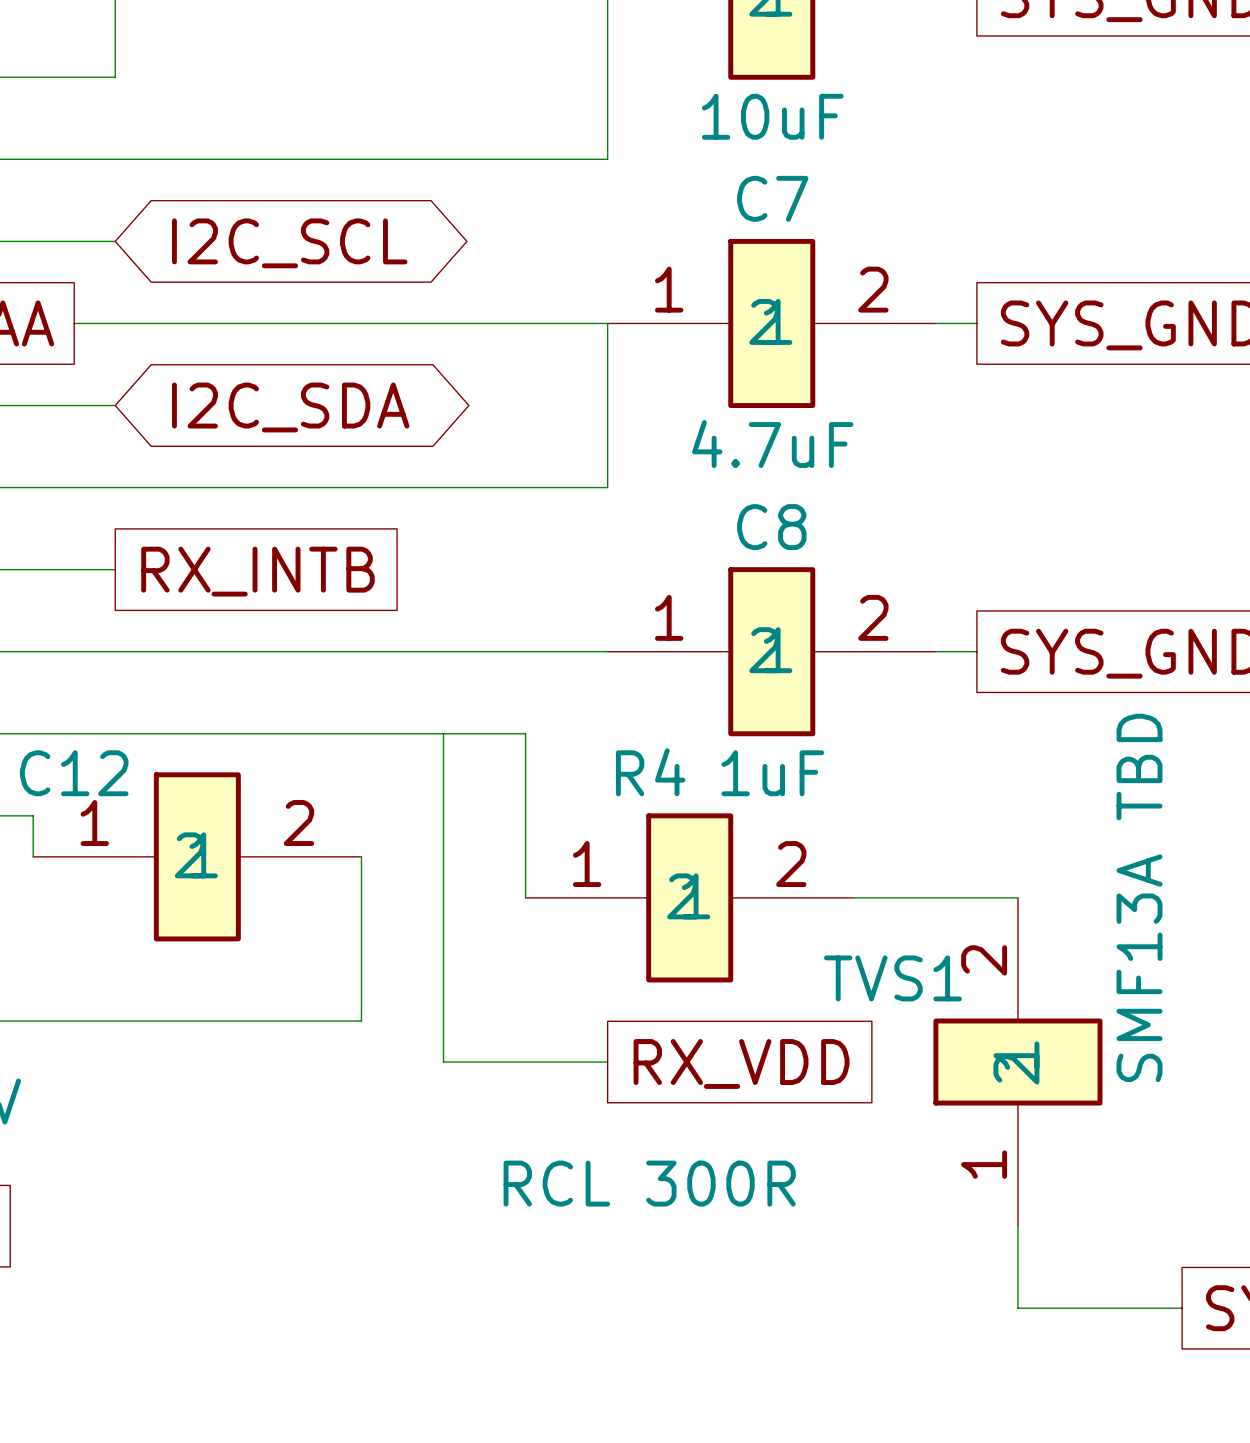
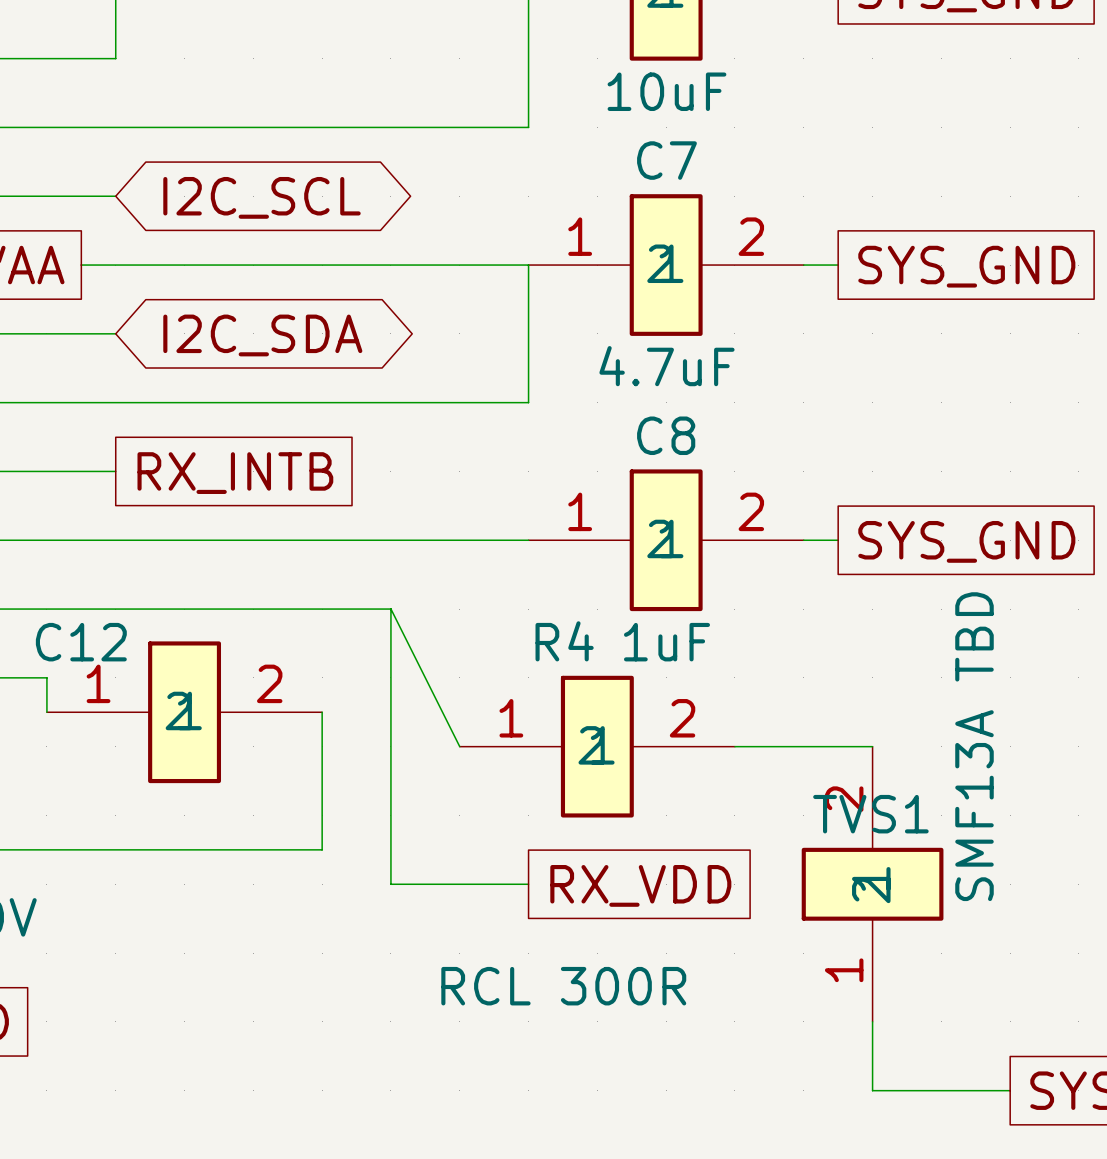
wire: (443, 733) (525, 733) (525, 897) -> (390, 609) (459, 746)
TVS1 name position: TVS1 (892, 978) -> TVS1 (870, 814)

